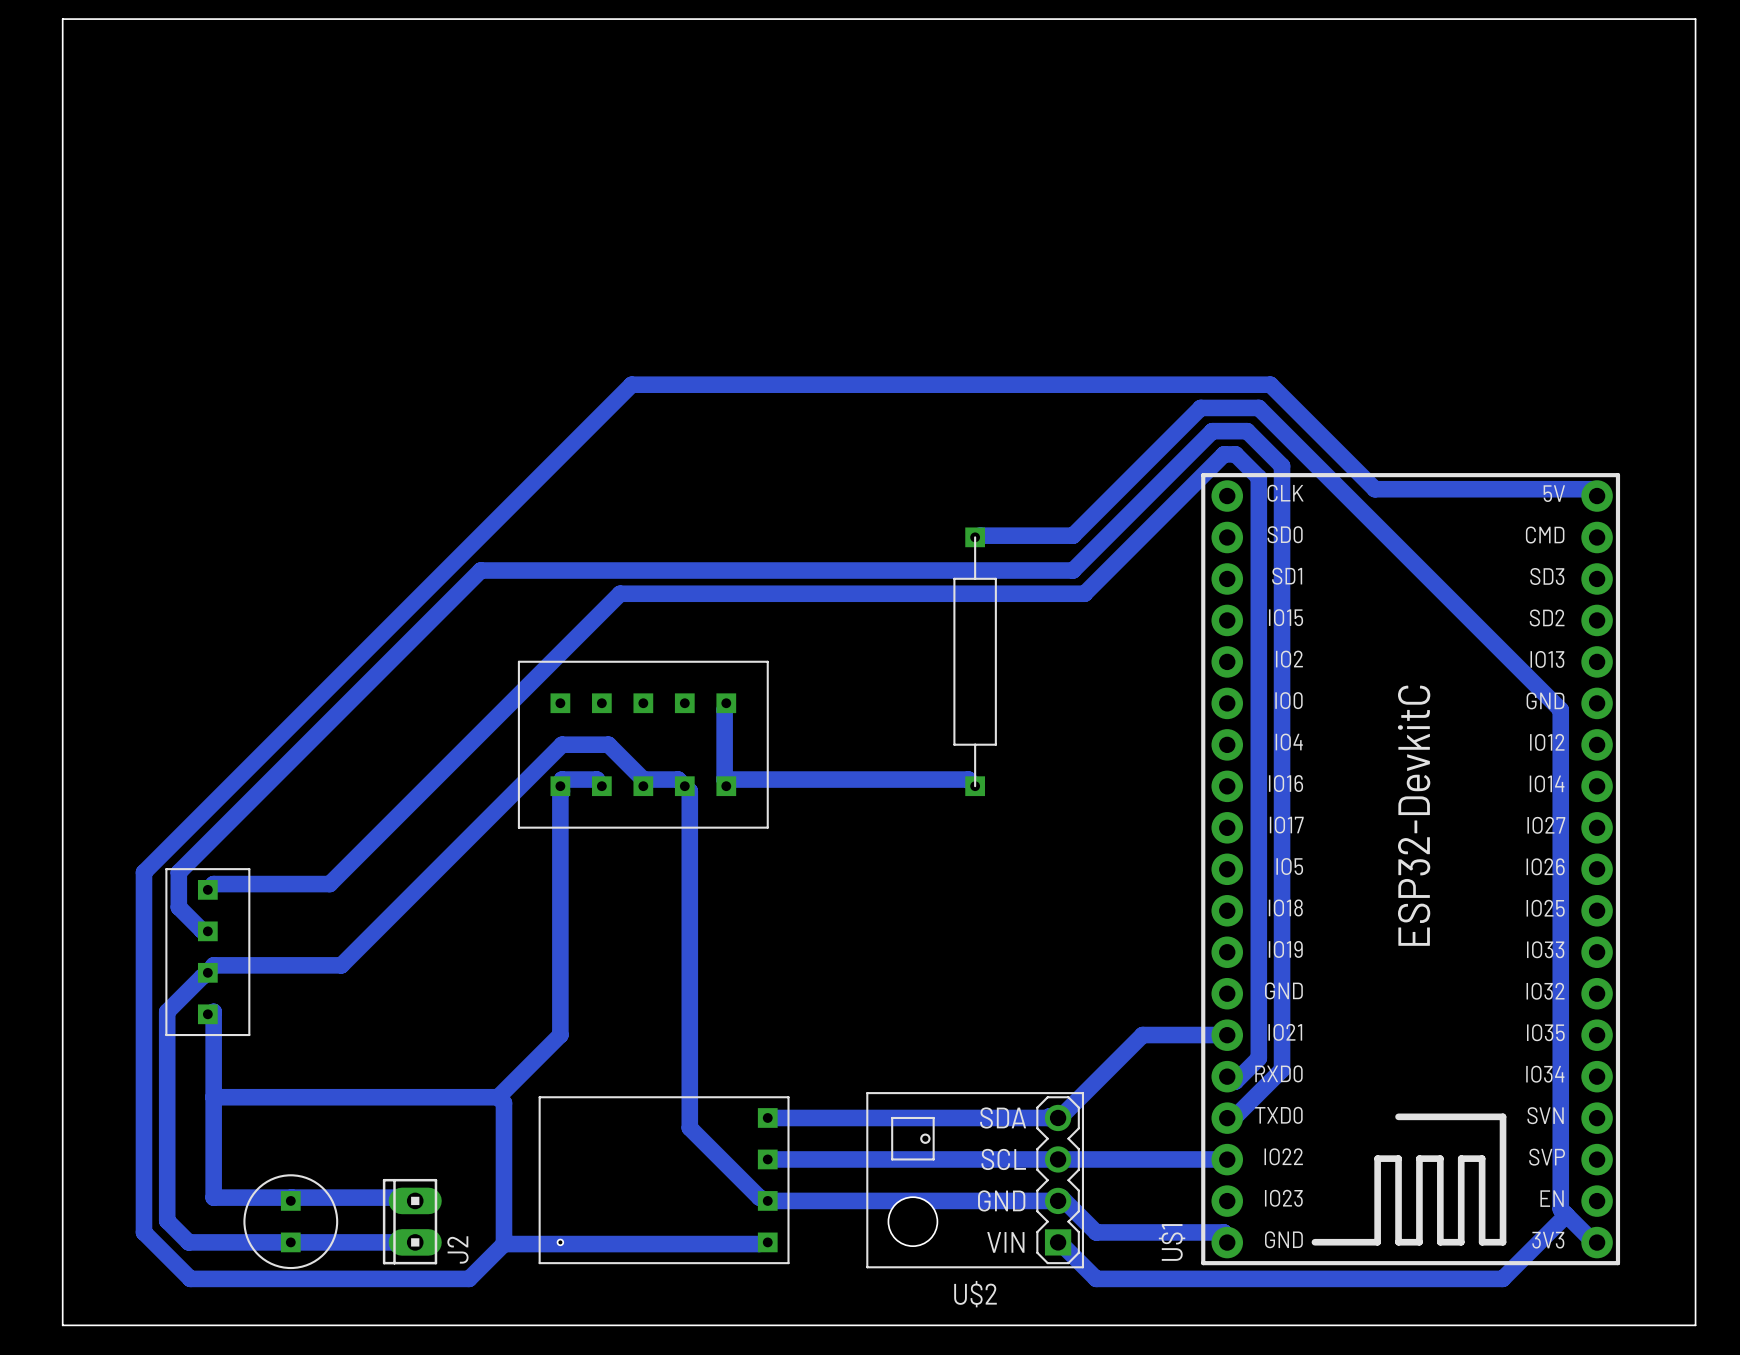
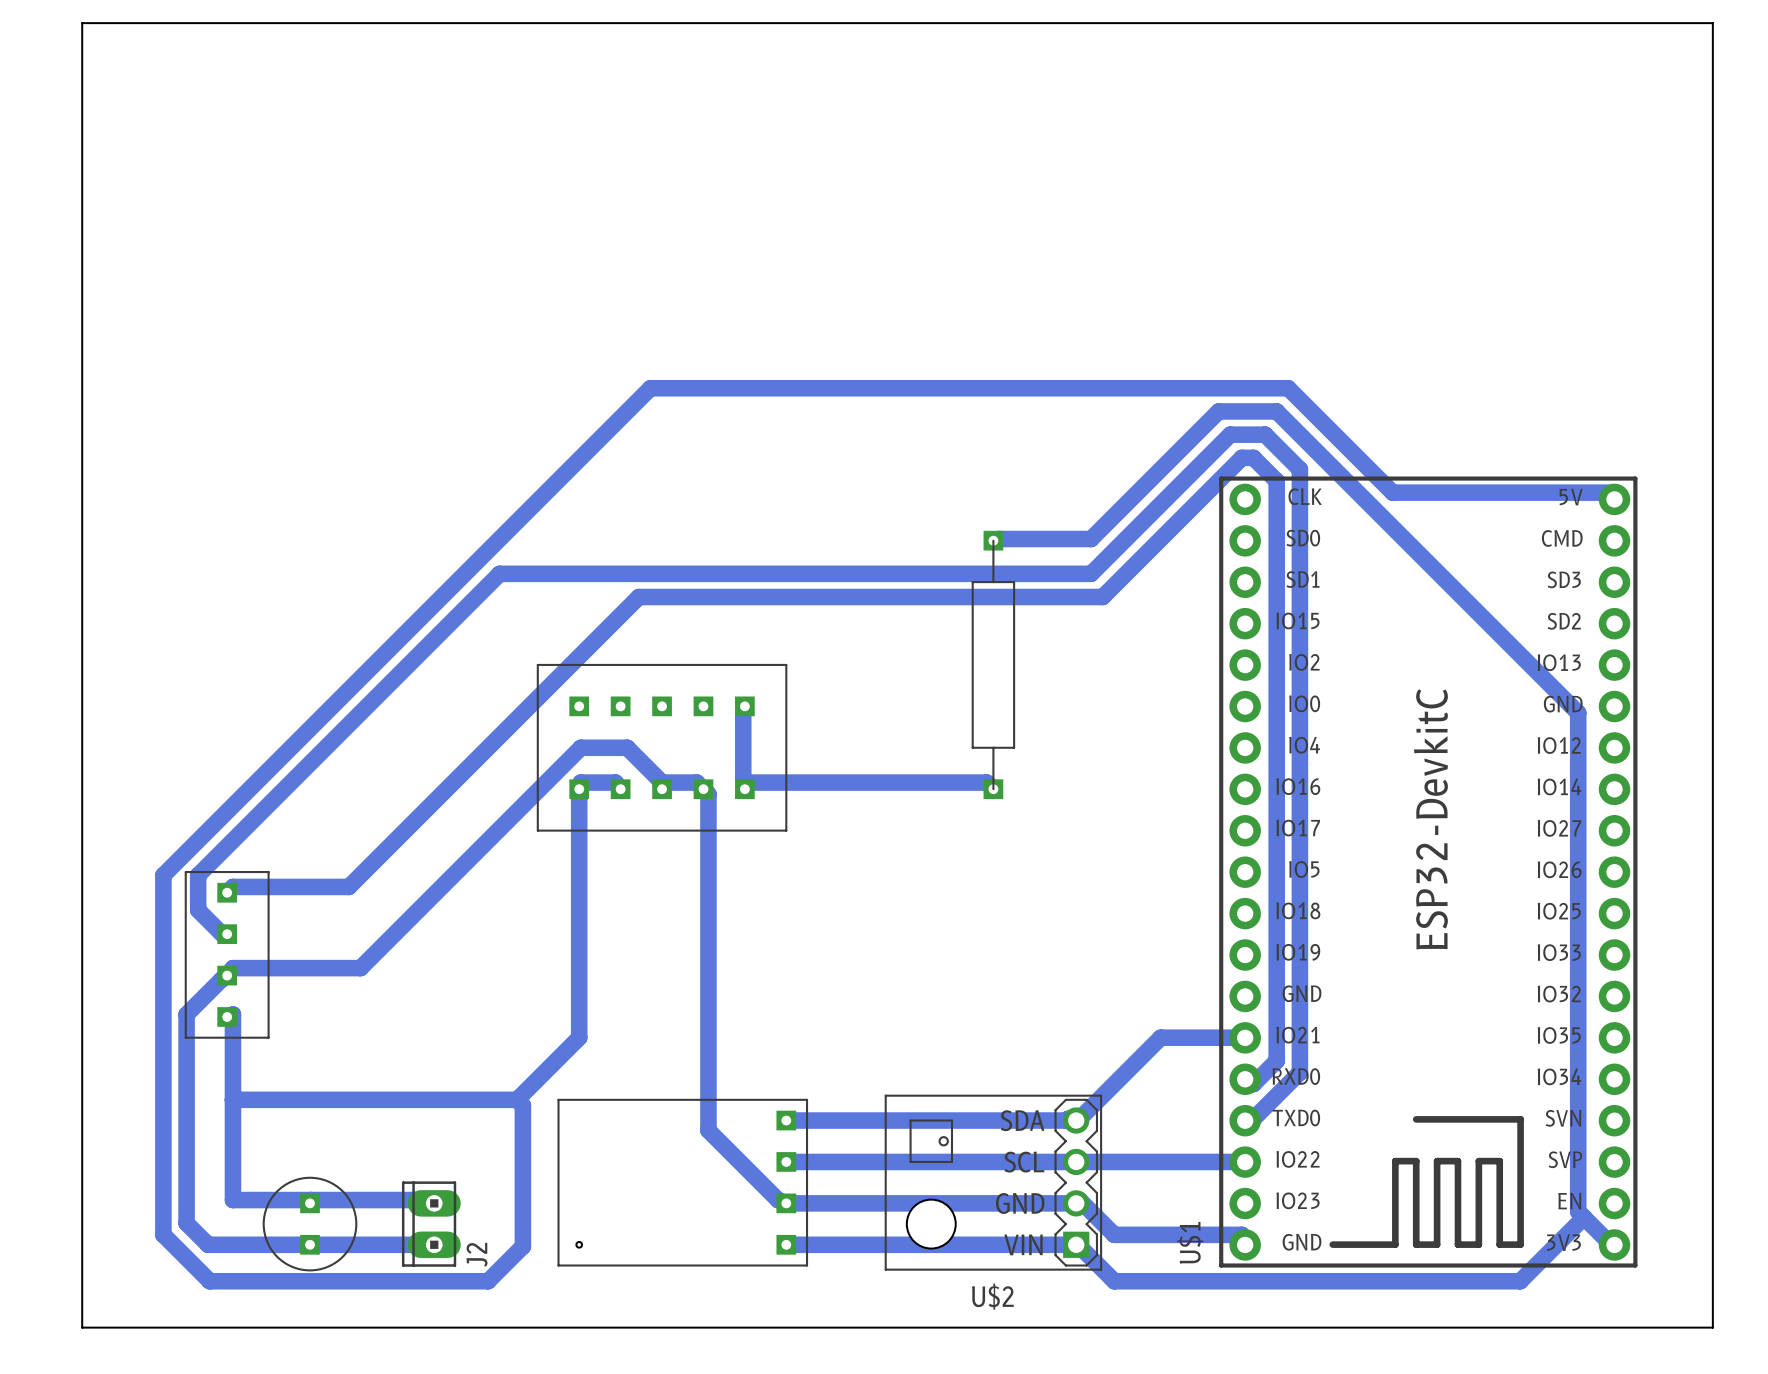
bottom track: none -> (786, 1244) (1077, 1244) (1079, 1246)
bottom track: (503, 1244) (759, 1244) -> none

